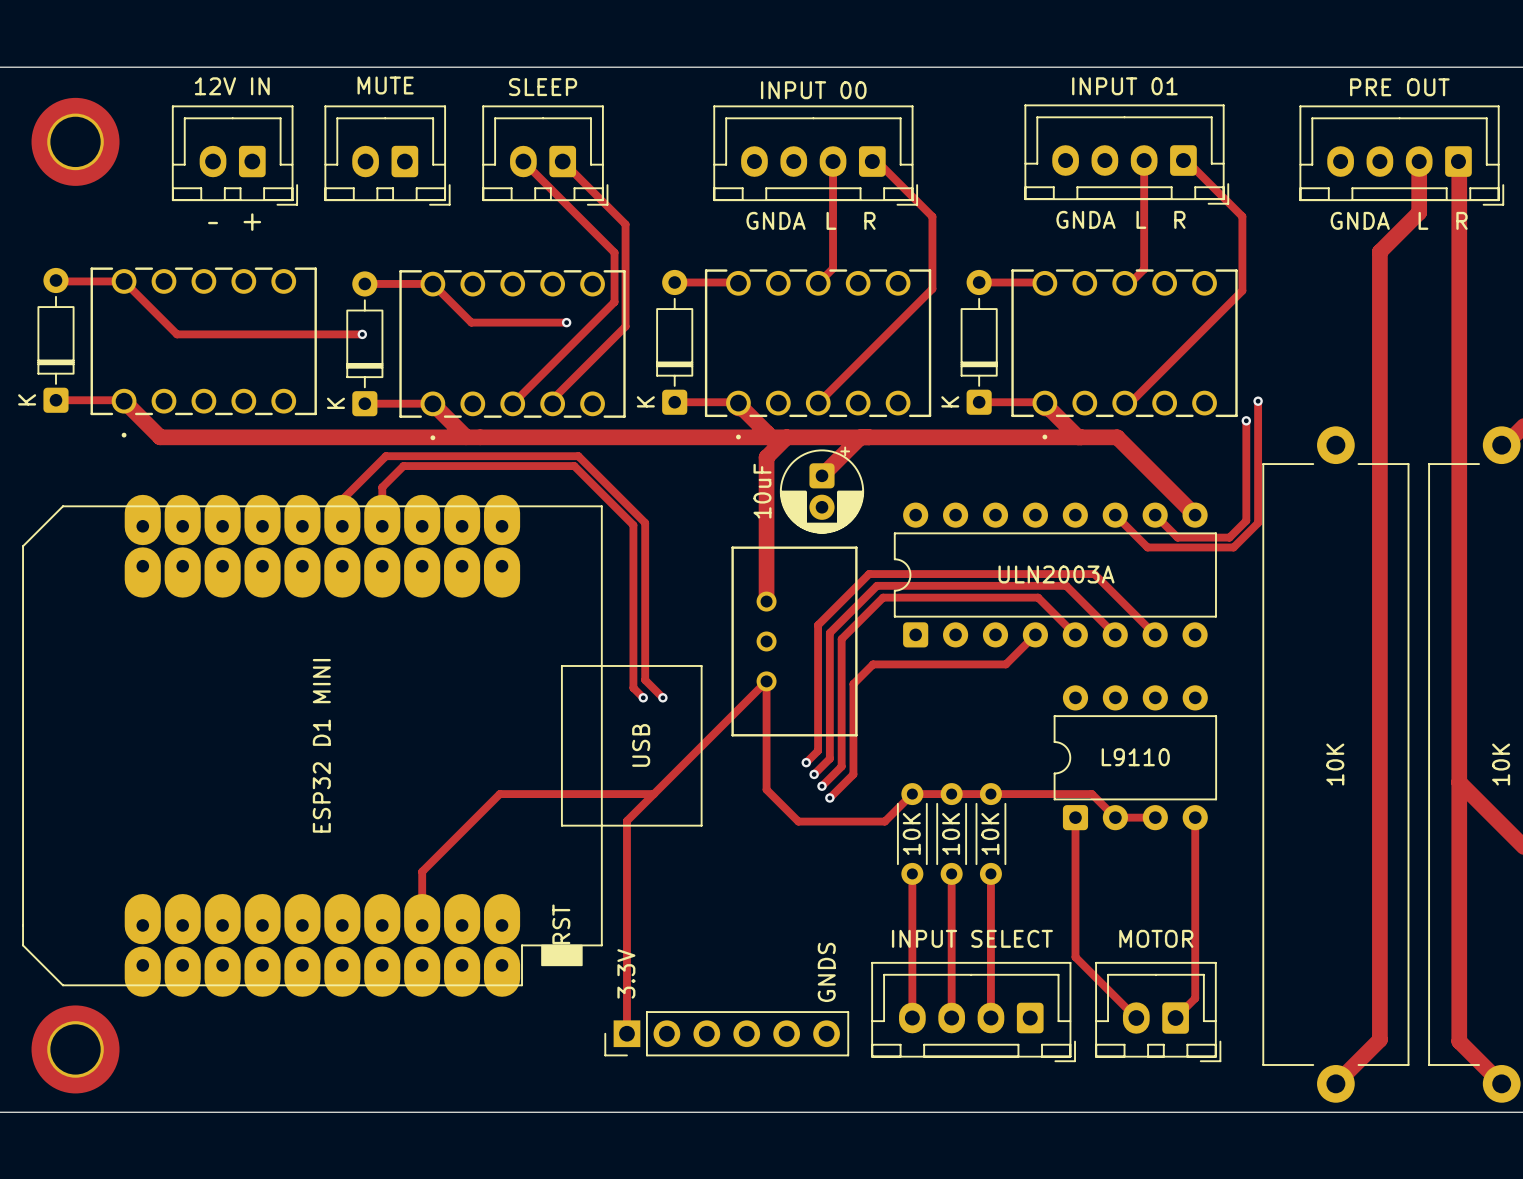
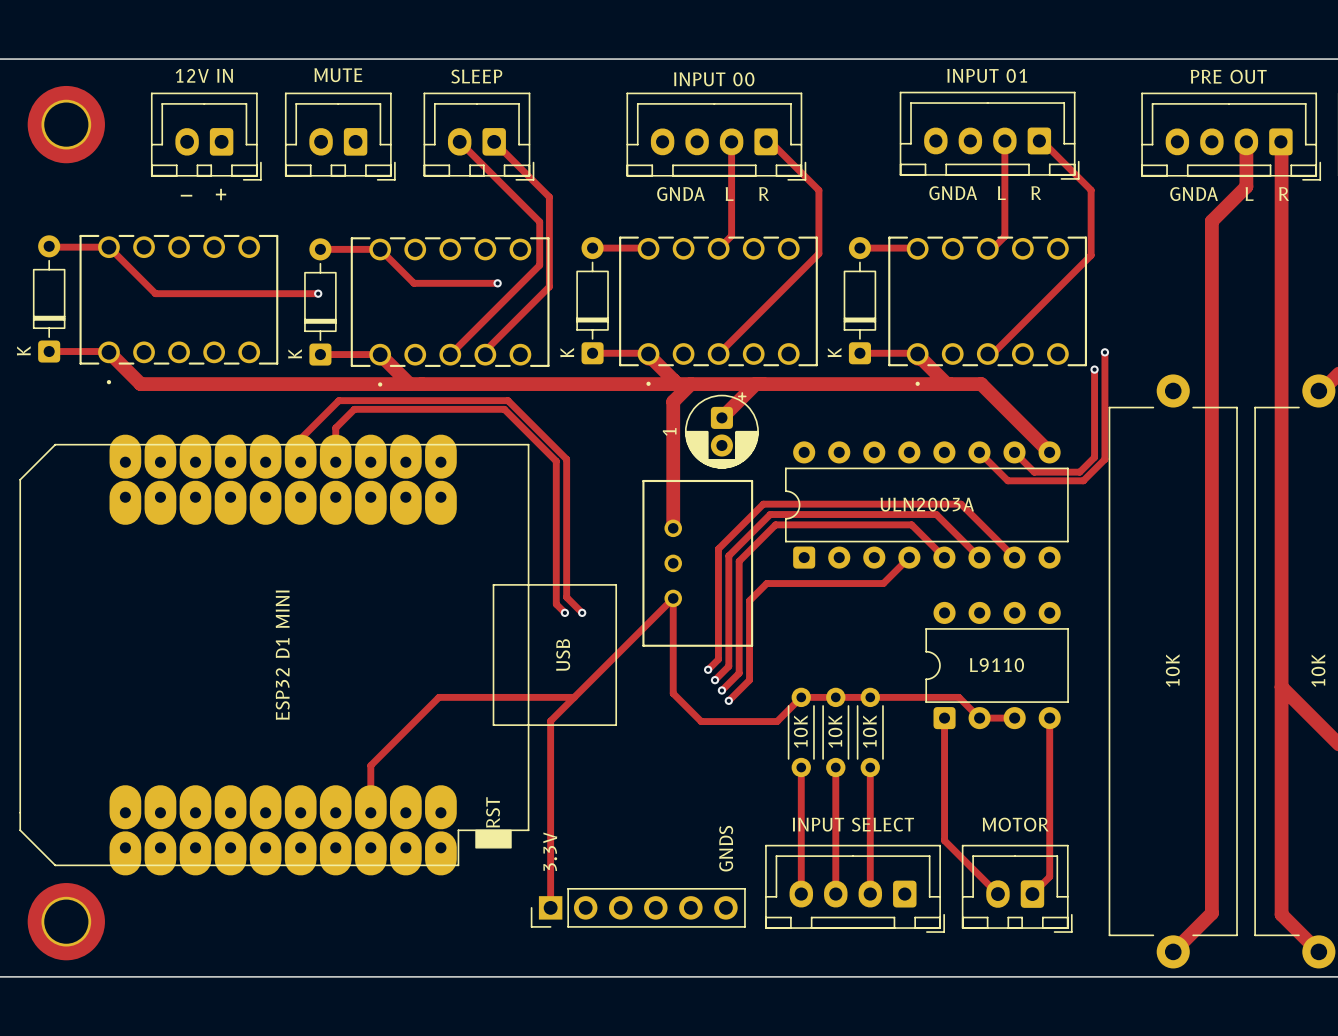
part value: 10uF (762, 491) -> 1 (669, 431)

